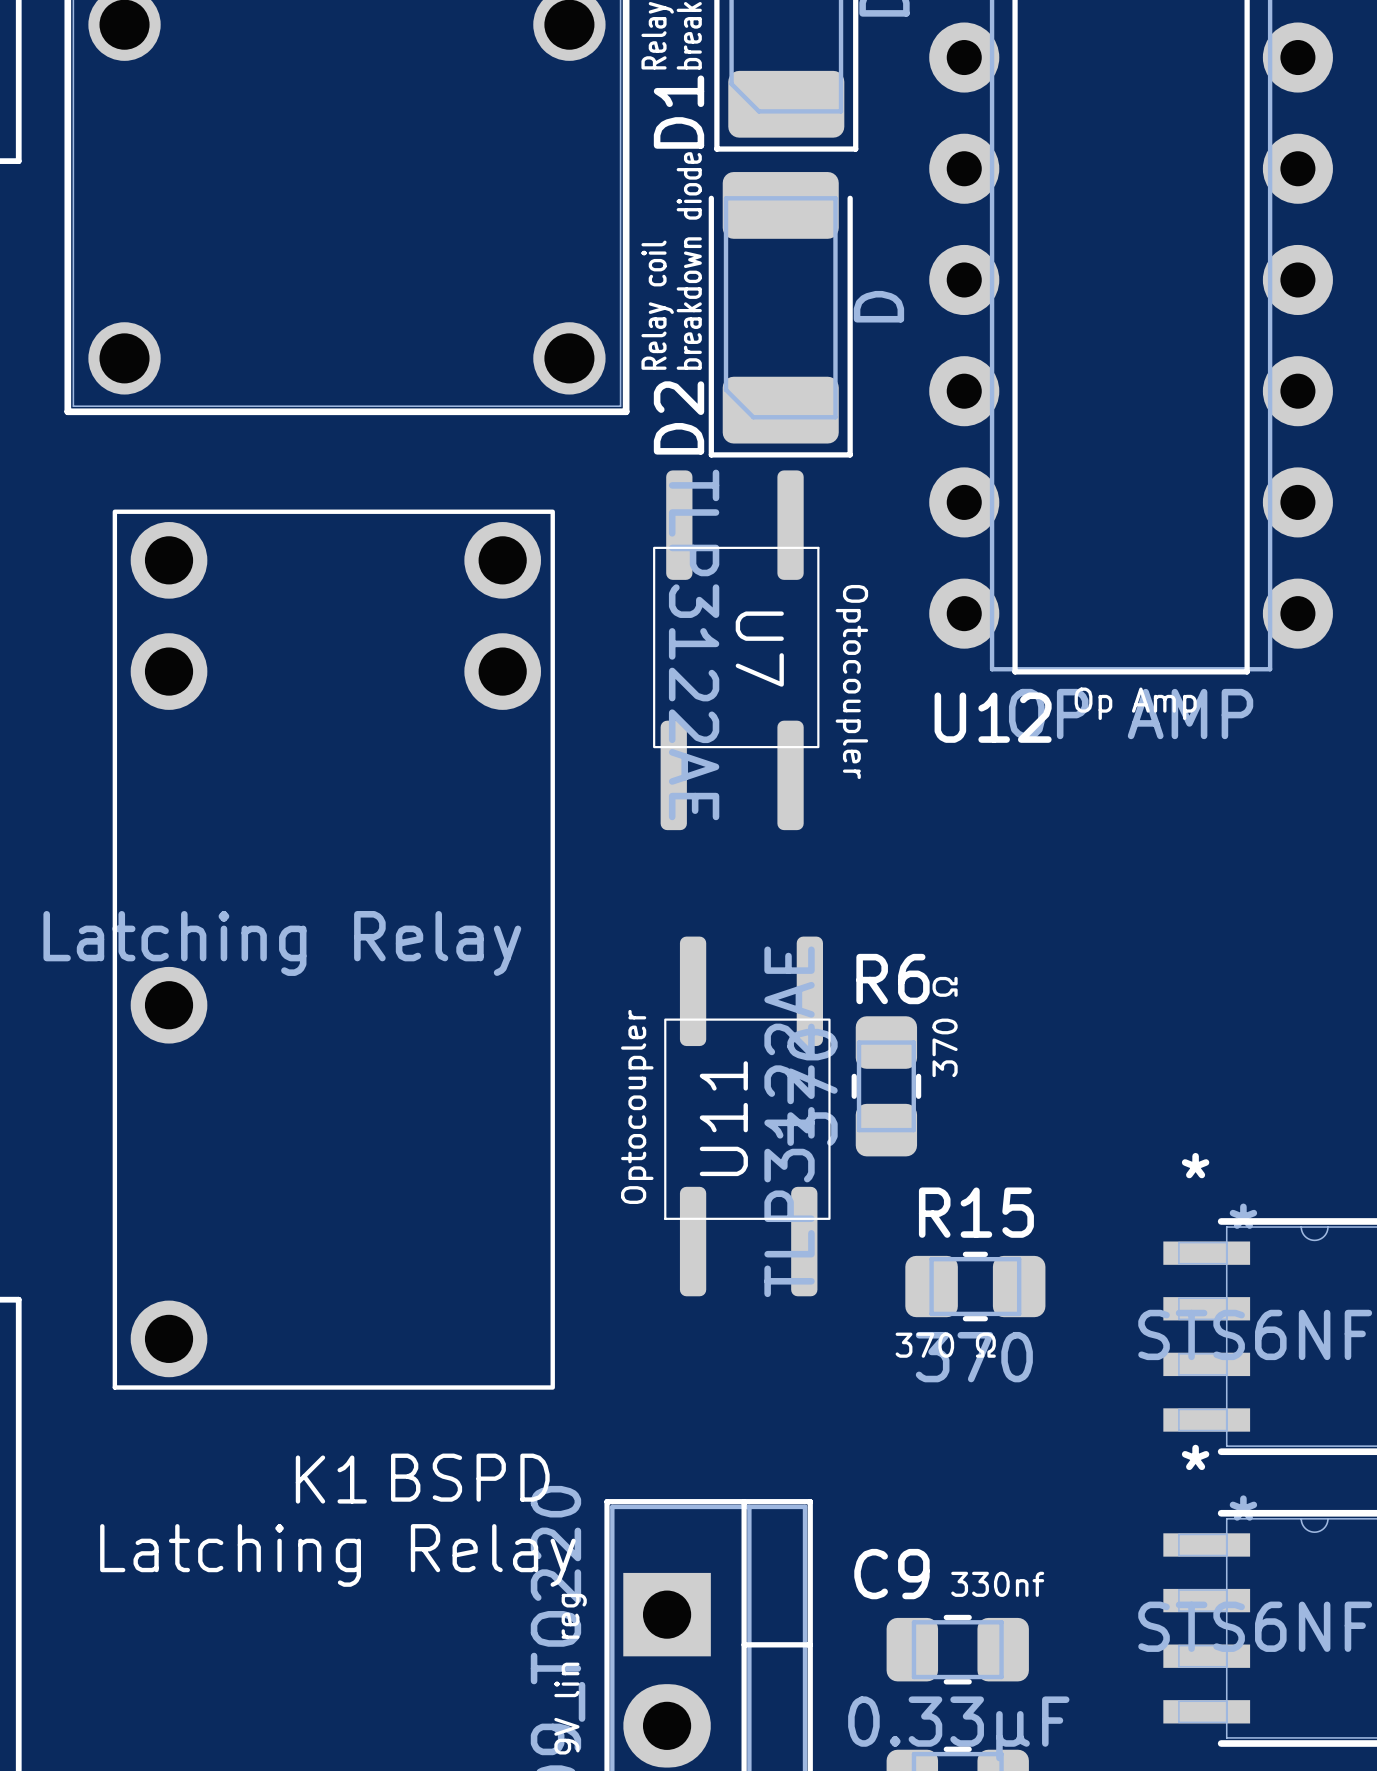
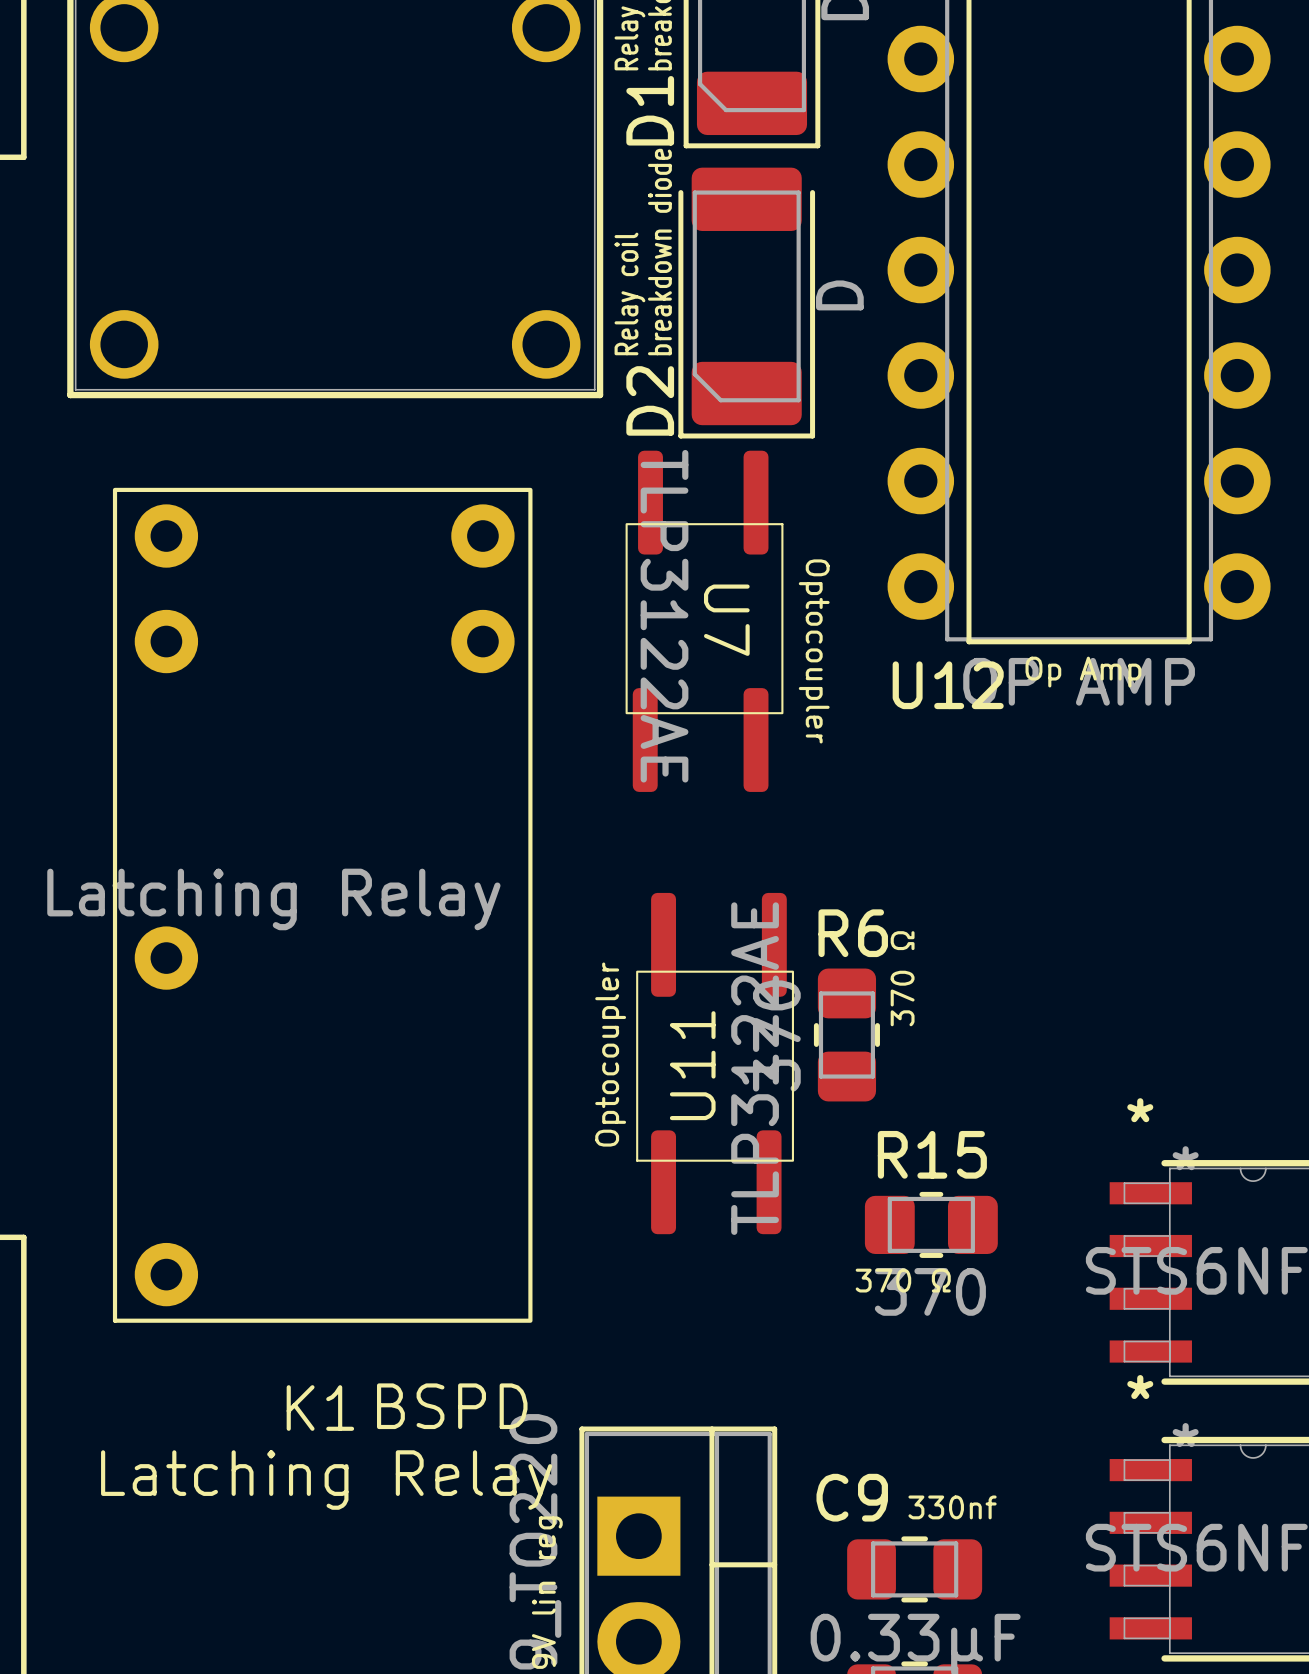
K1 footprint: [112, 509, 555, 1390] -> [112, 487, 533, 1323]

